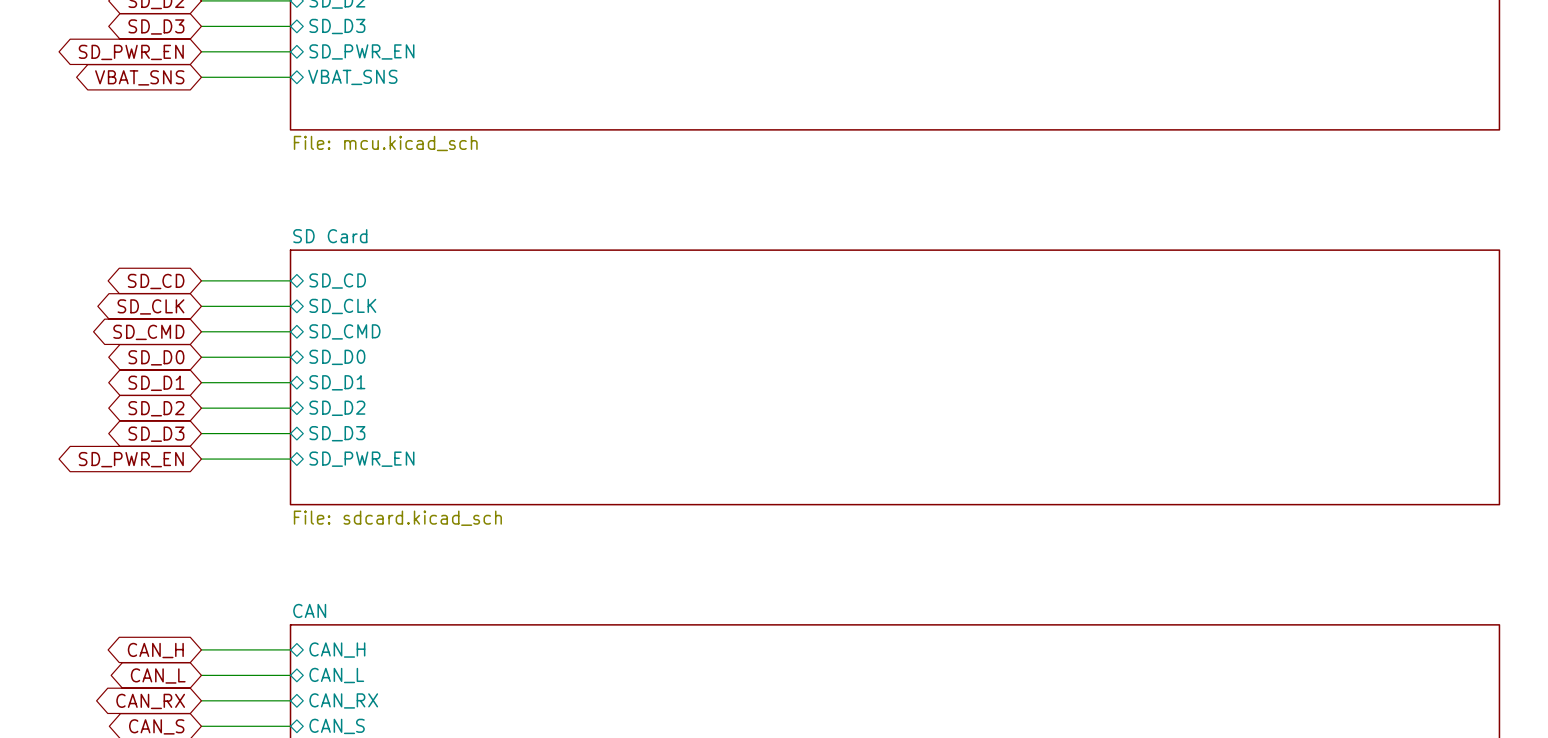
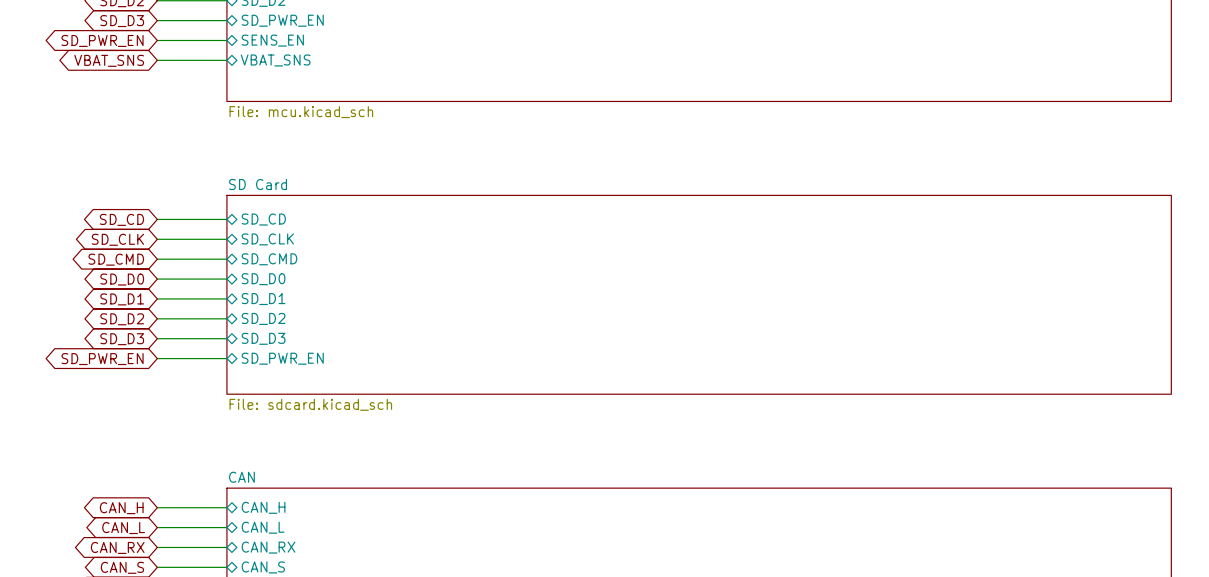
sheet pin: SD_D3 (337, 26) -> SD_PWR_EN (282, 20)
sheet pin: SD_PWR_EN (361, 51) -> SENS_EN (272, 40)

